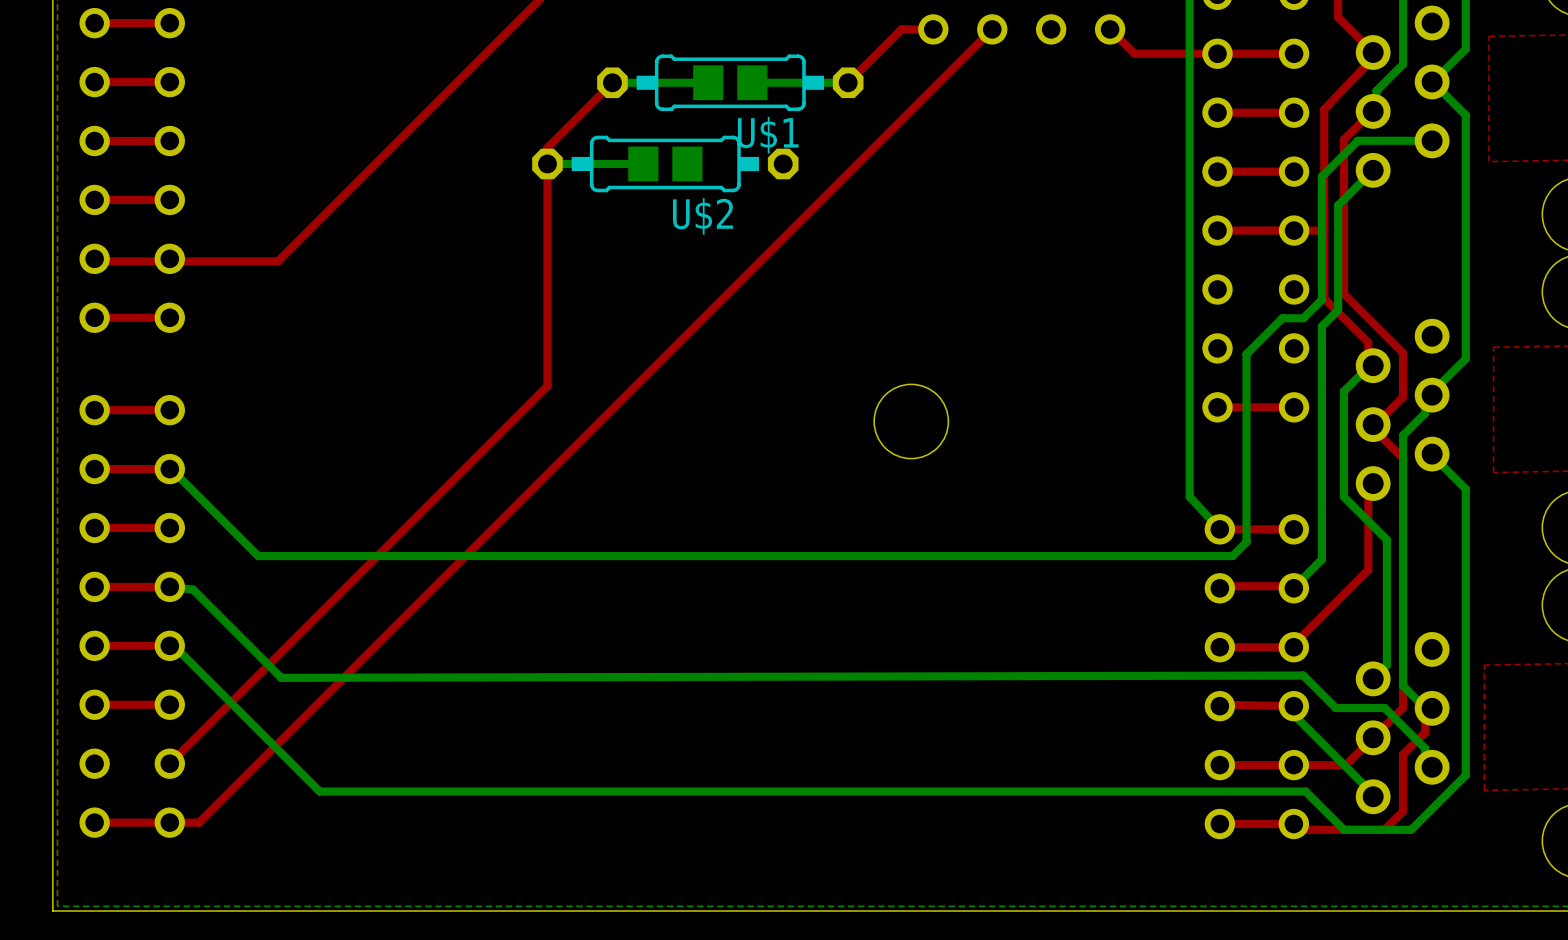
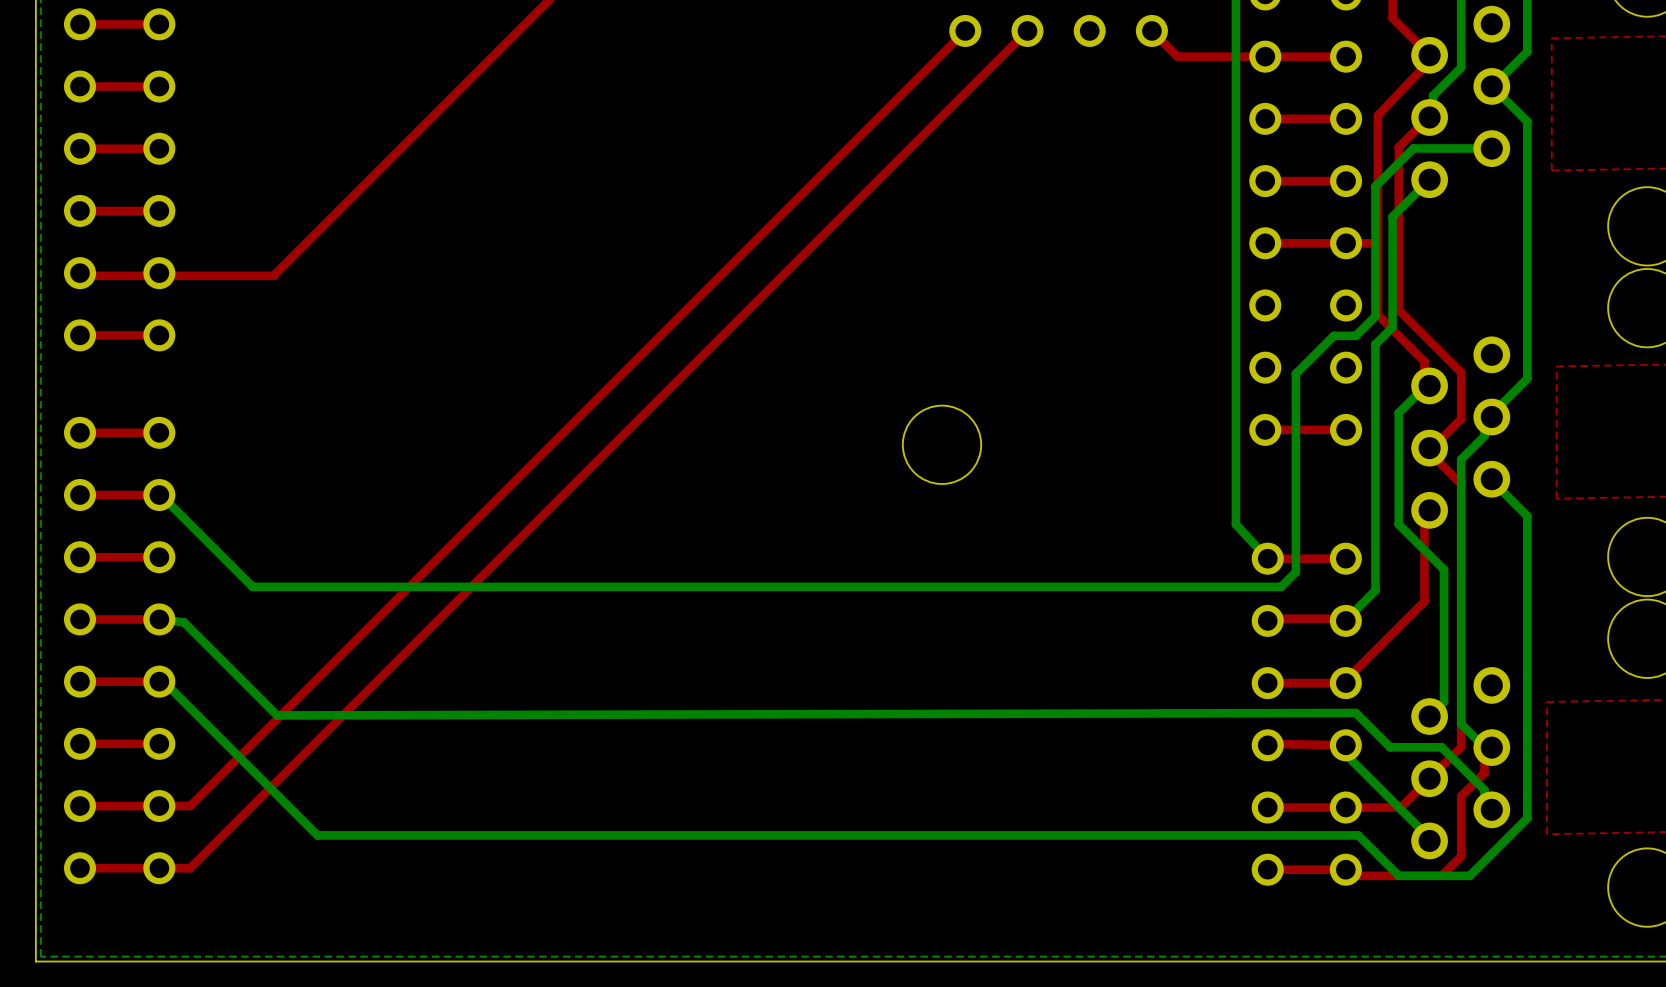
top track: (933, 29) (901, 29) (848, 82) -> (965, 30) (190, 806) (79, 806)
top track: (612, 82) (547, 147) (547, 385) (169, 763) -> none
bottom track: (708, 82) (612, 82) -> none
U$1: (730, 82) -> none
bottom track: (848, 82) (752, 82) -> none
bottom track: (643, 163) (547, 163) -> none
U$2: (665, 163) -> none

